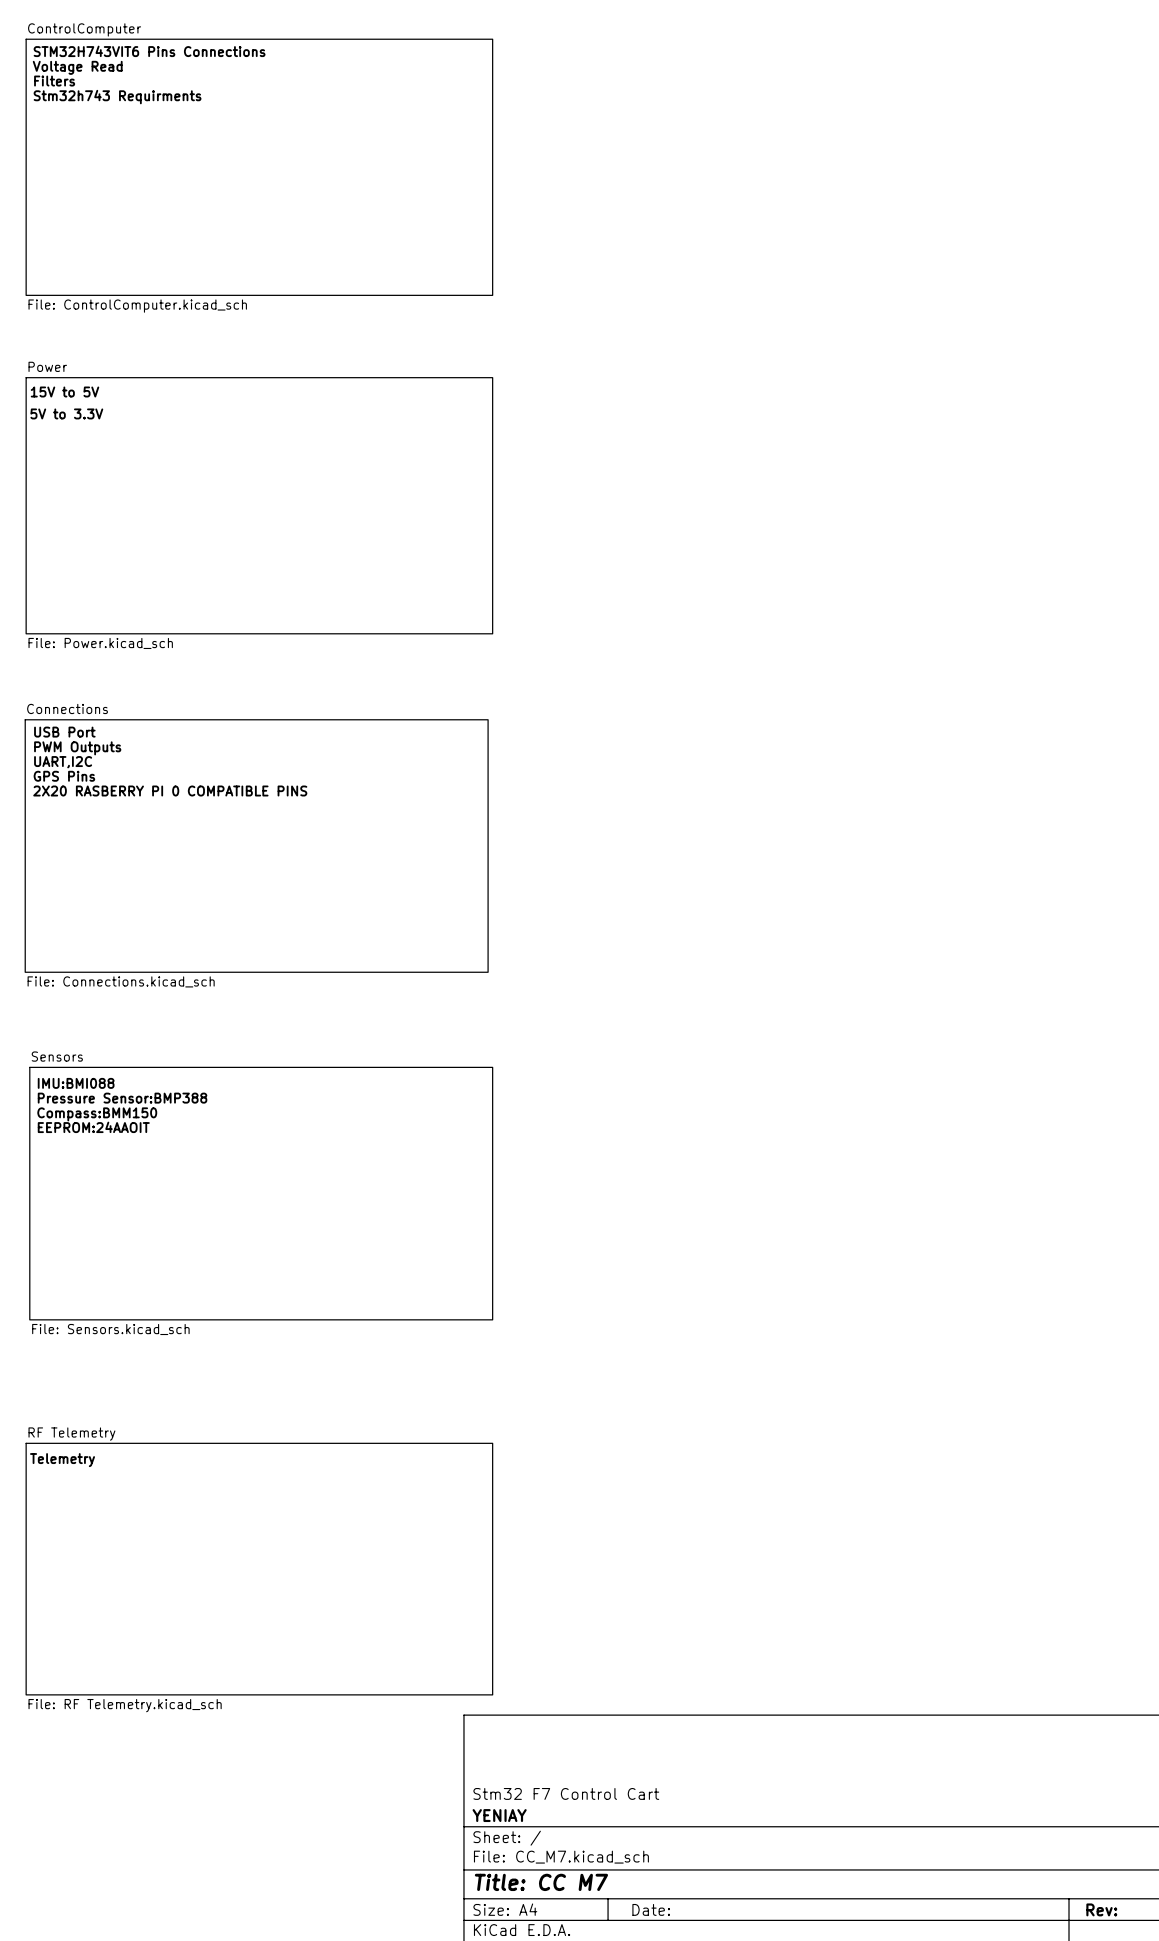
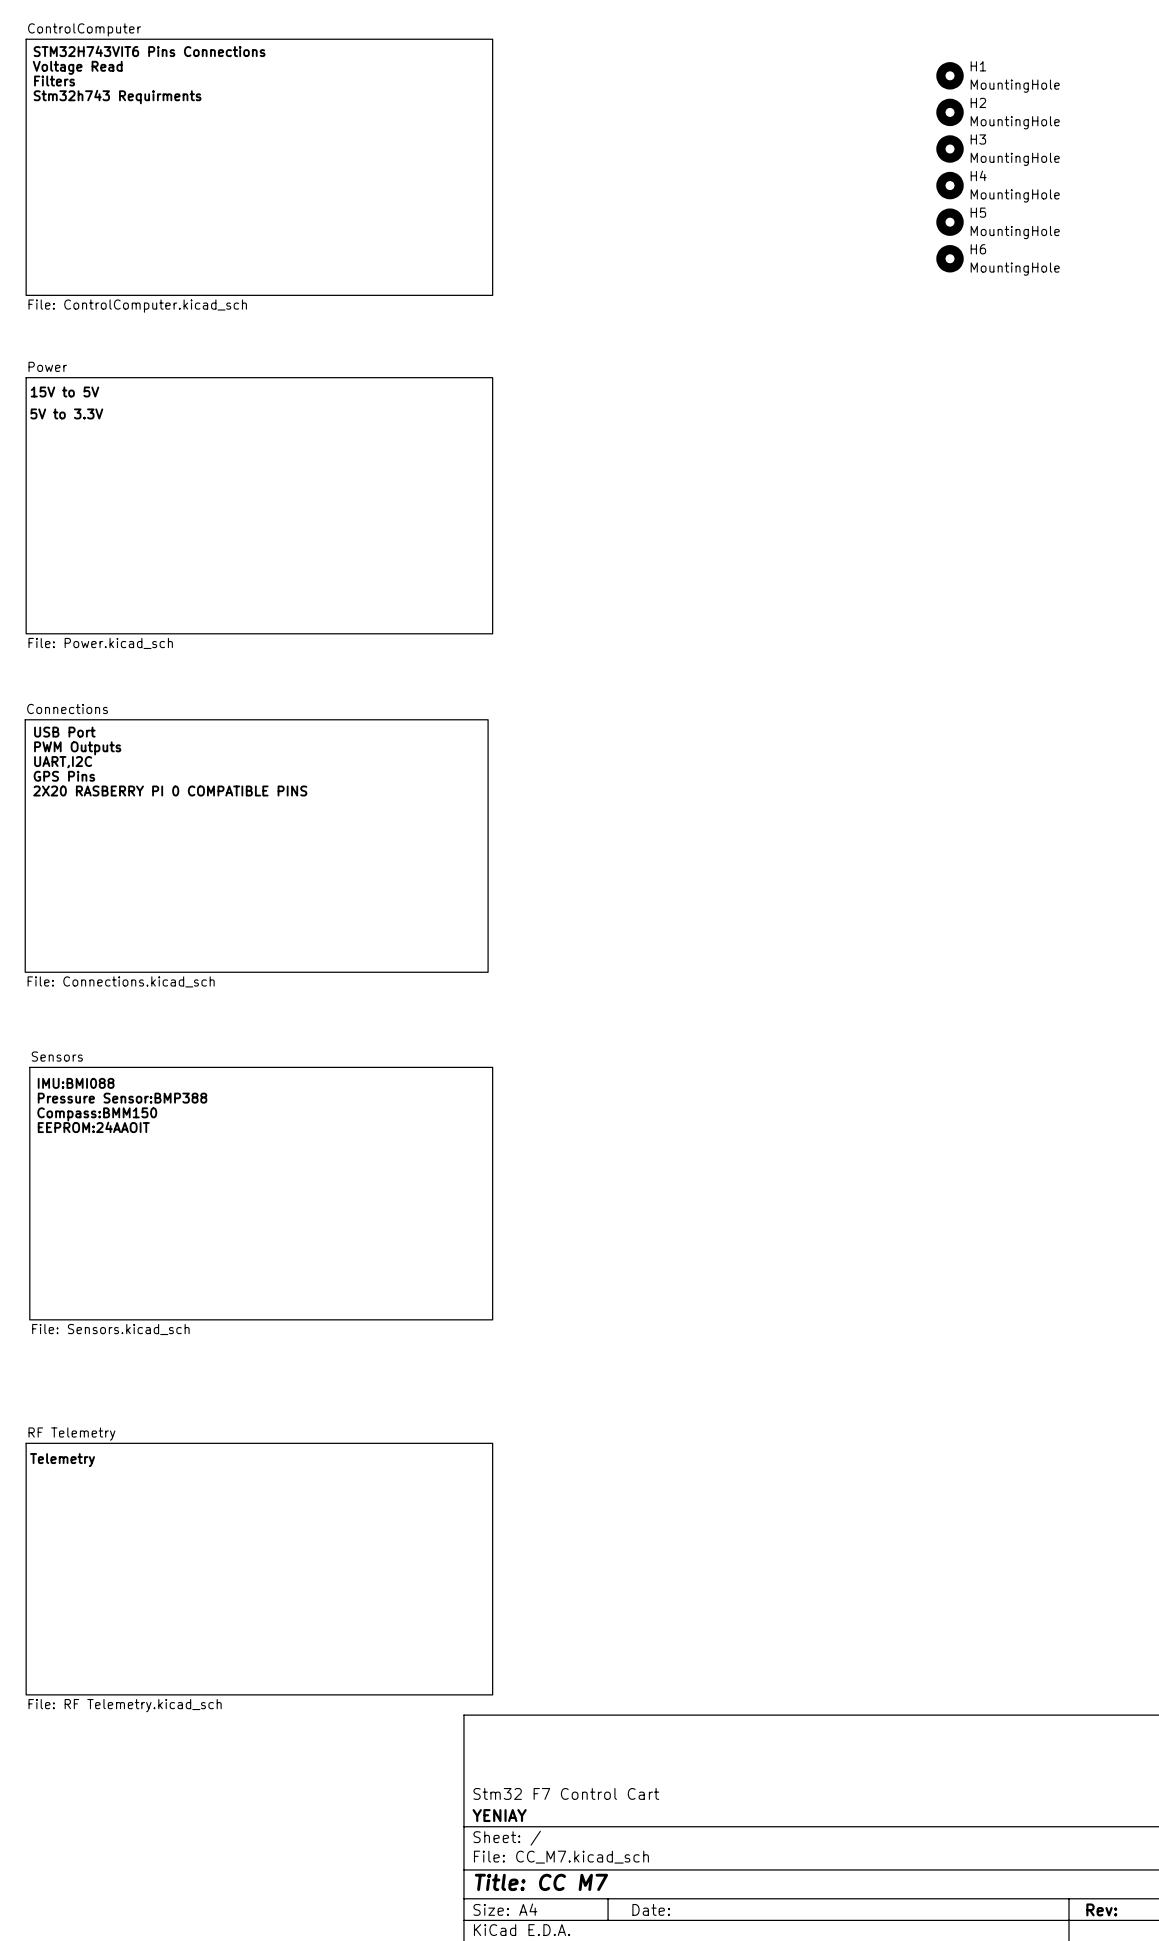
H1: none -> MountingHole (950, 75)
H2: none -> MountingHole (950, 112)
H3: none -> MountingHole (950, 148)
H4: none -> MountingHole (950, 185)
H5: none -> MountingHole (950, 222)
H6: none -> MountingHole (950, 258)

